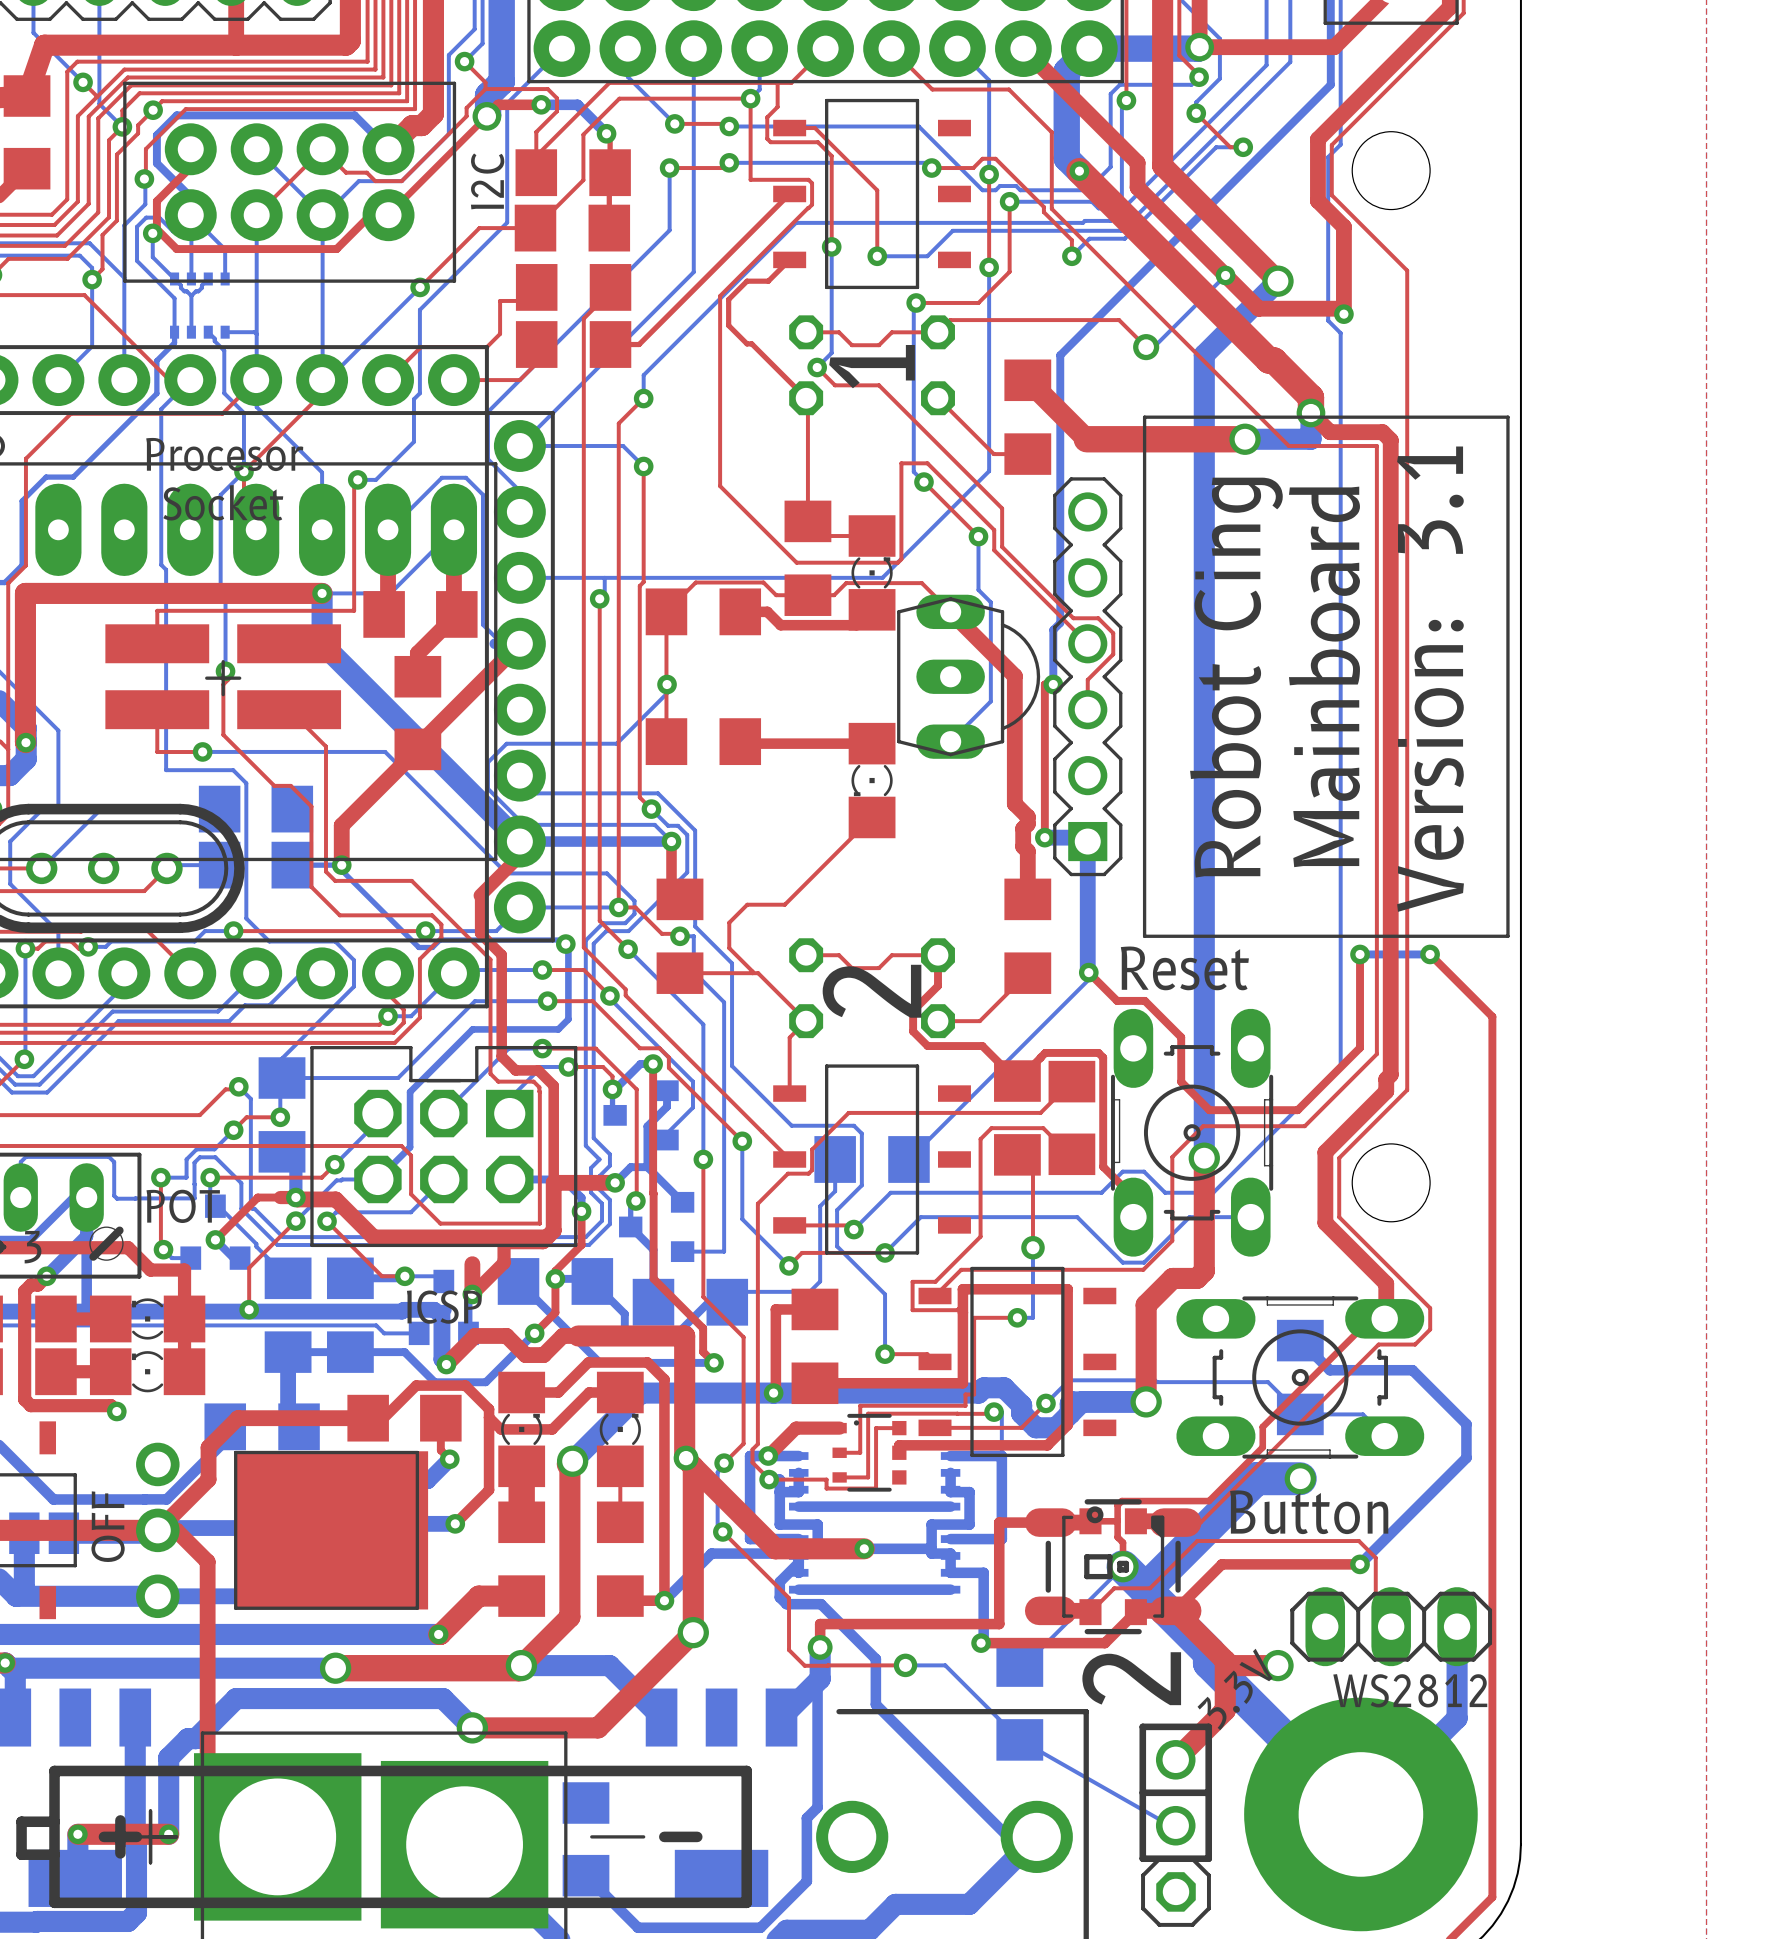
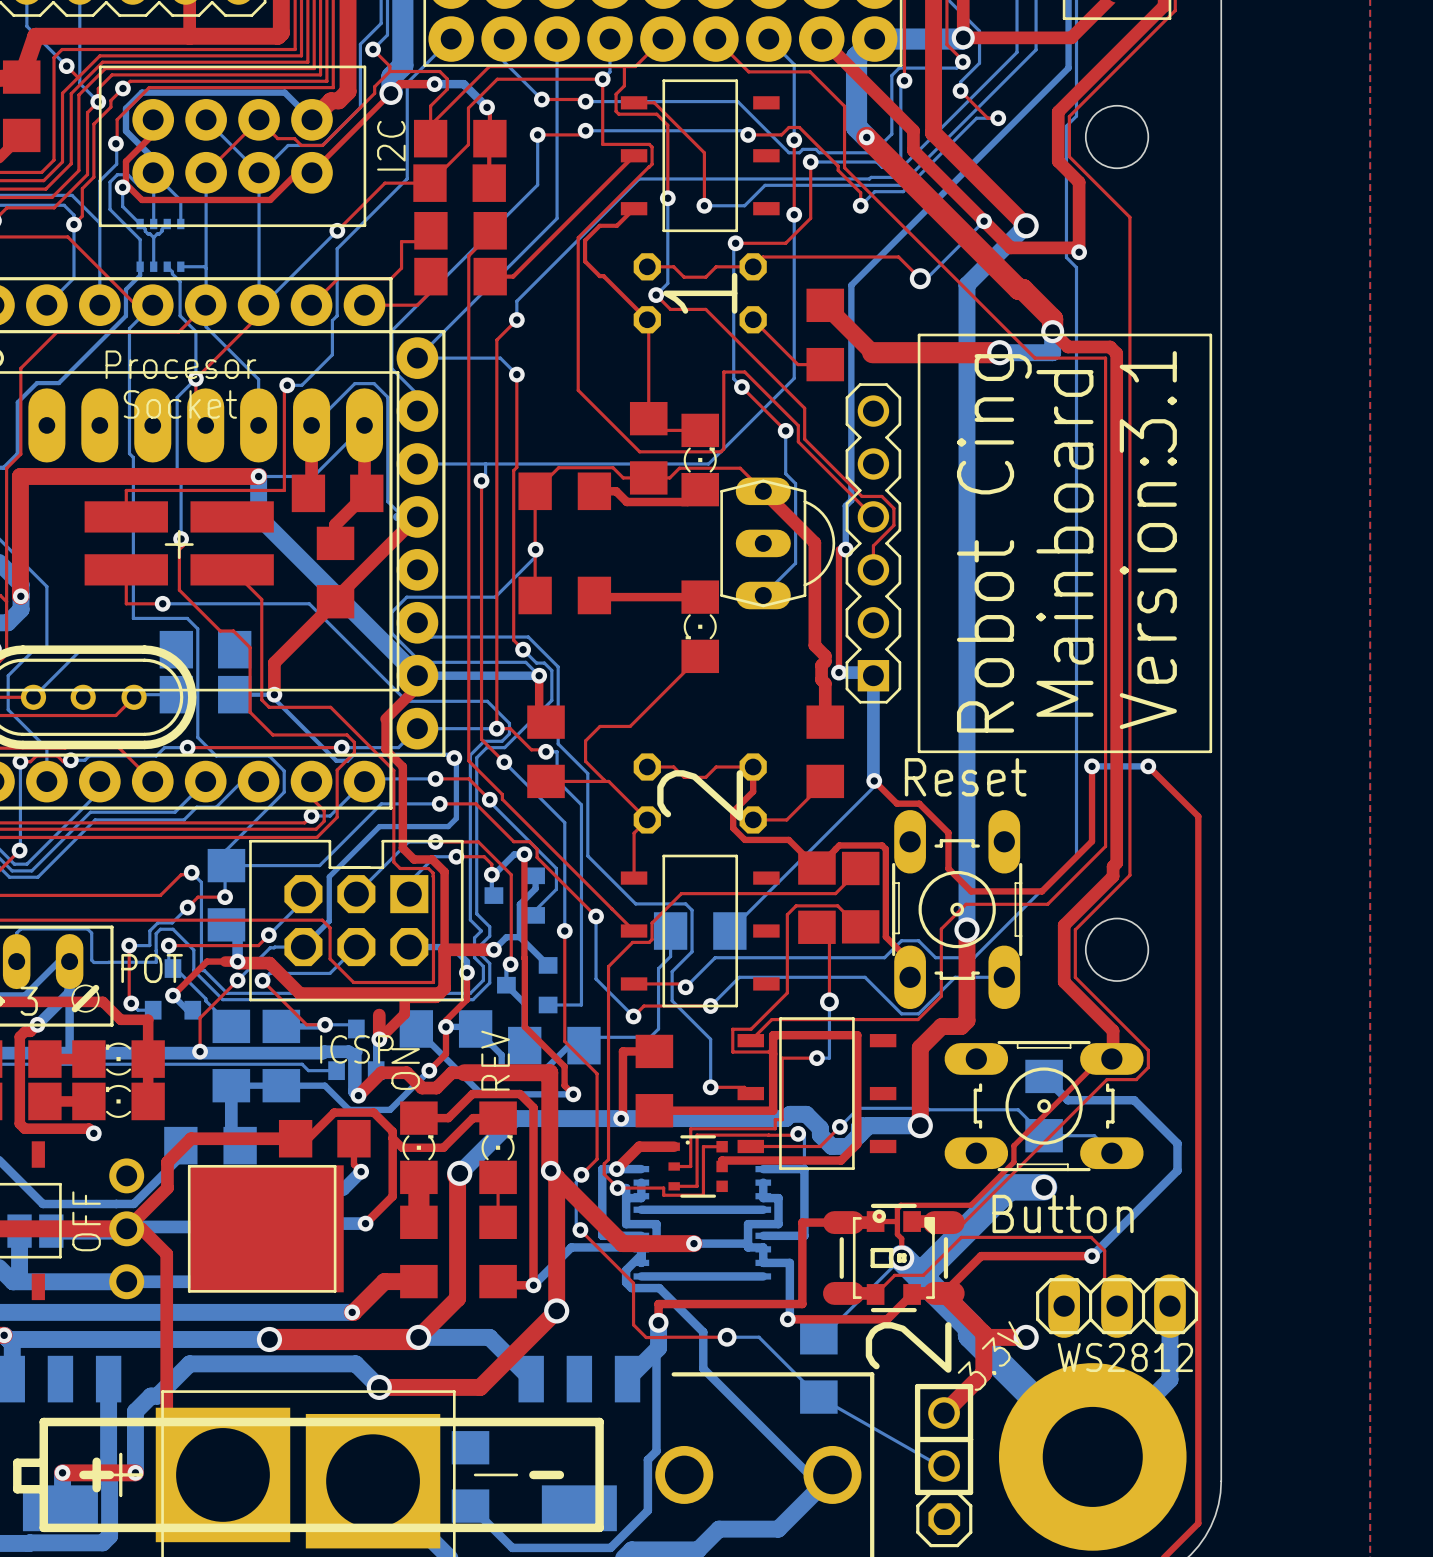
REV name: none -> REV (495, 1060)
ON name: none -> ON (405, 1069)

